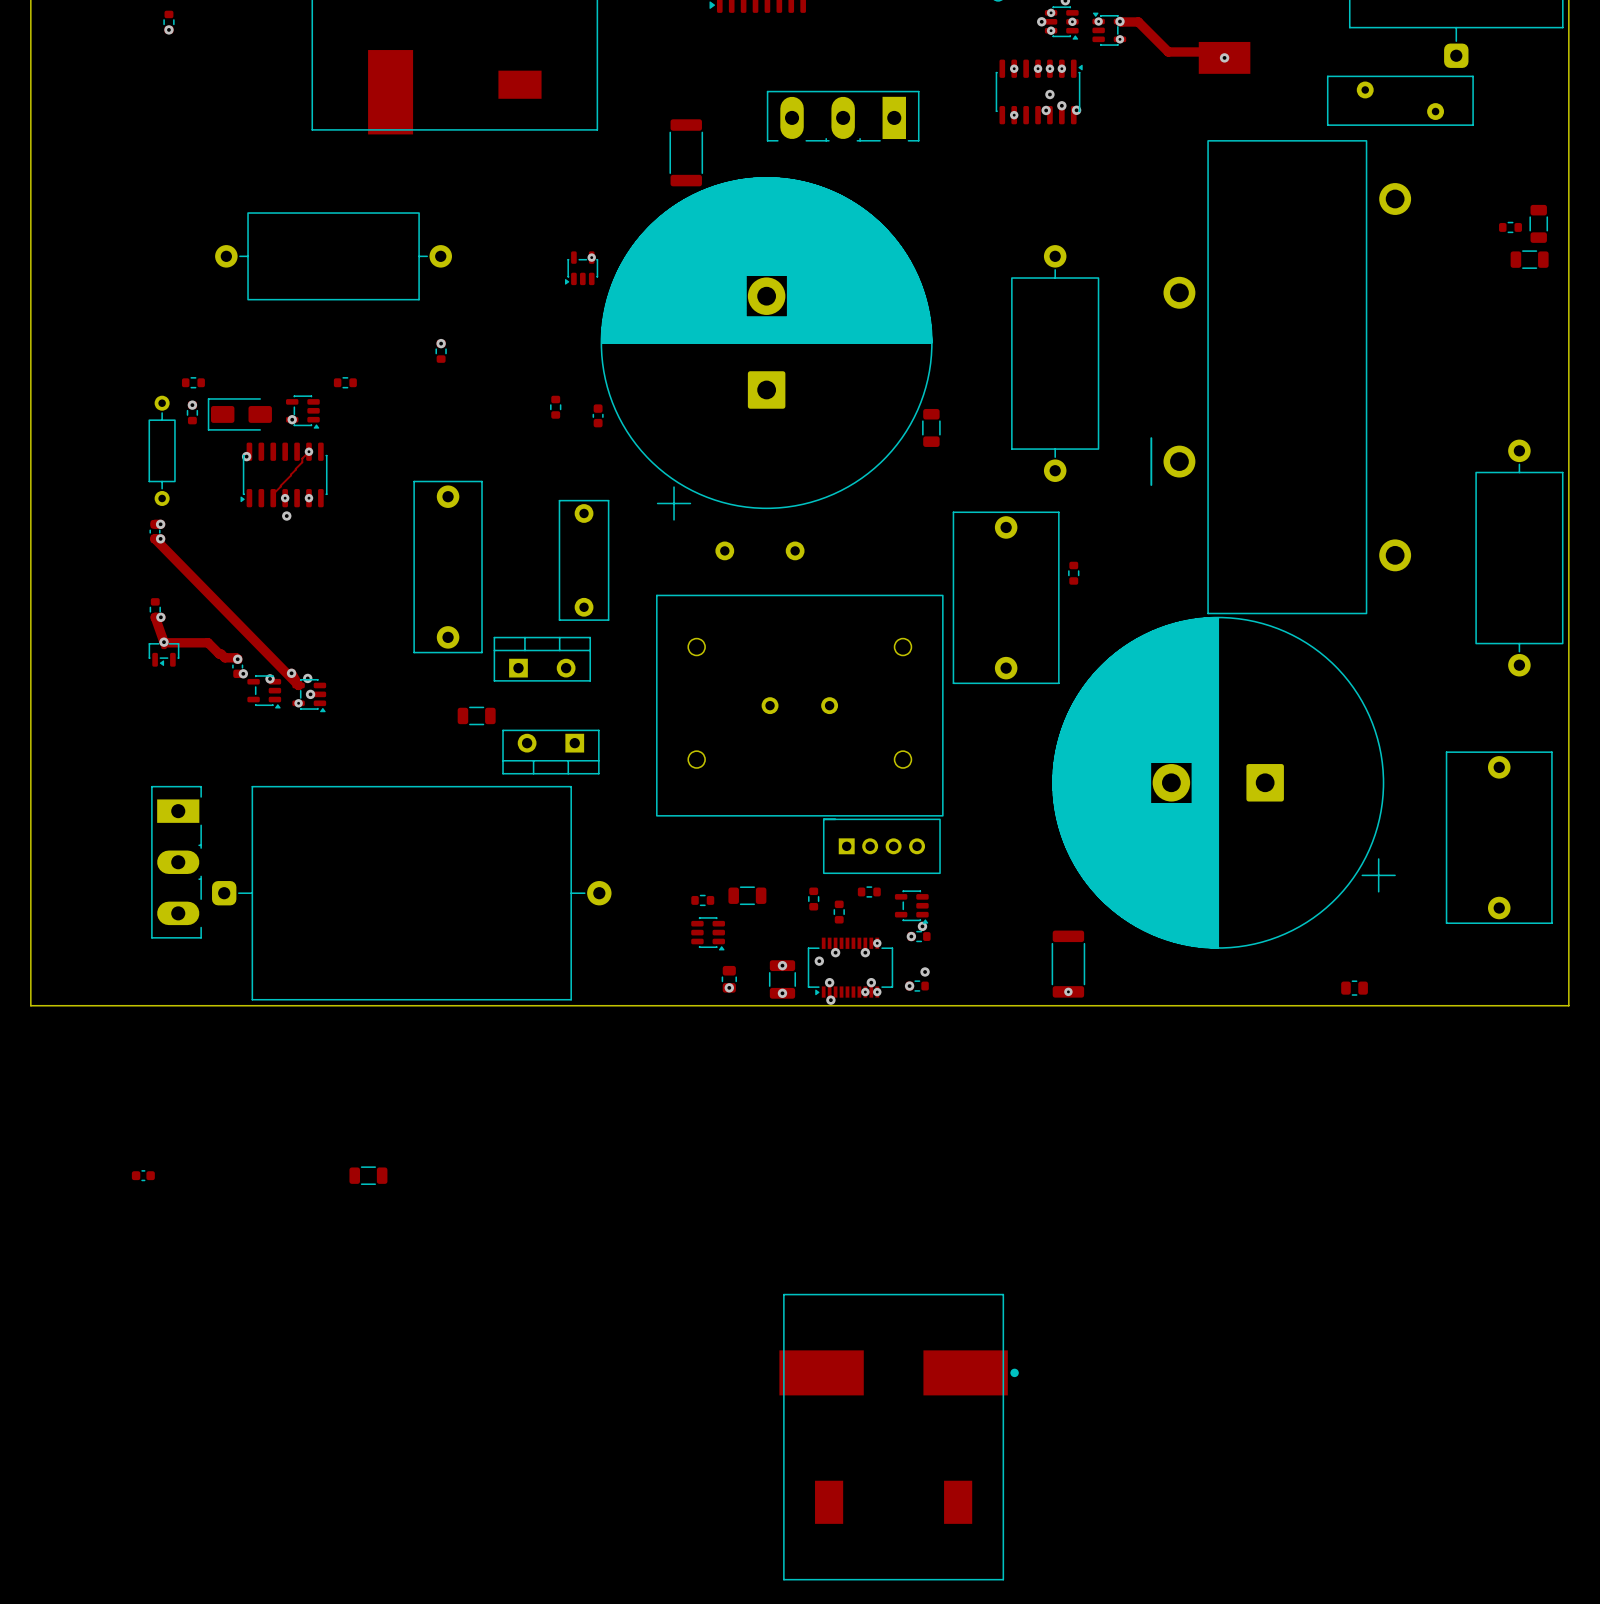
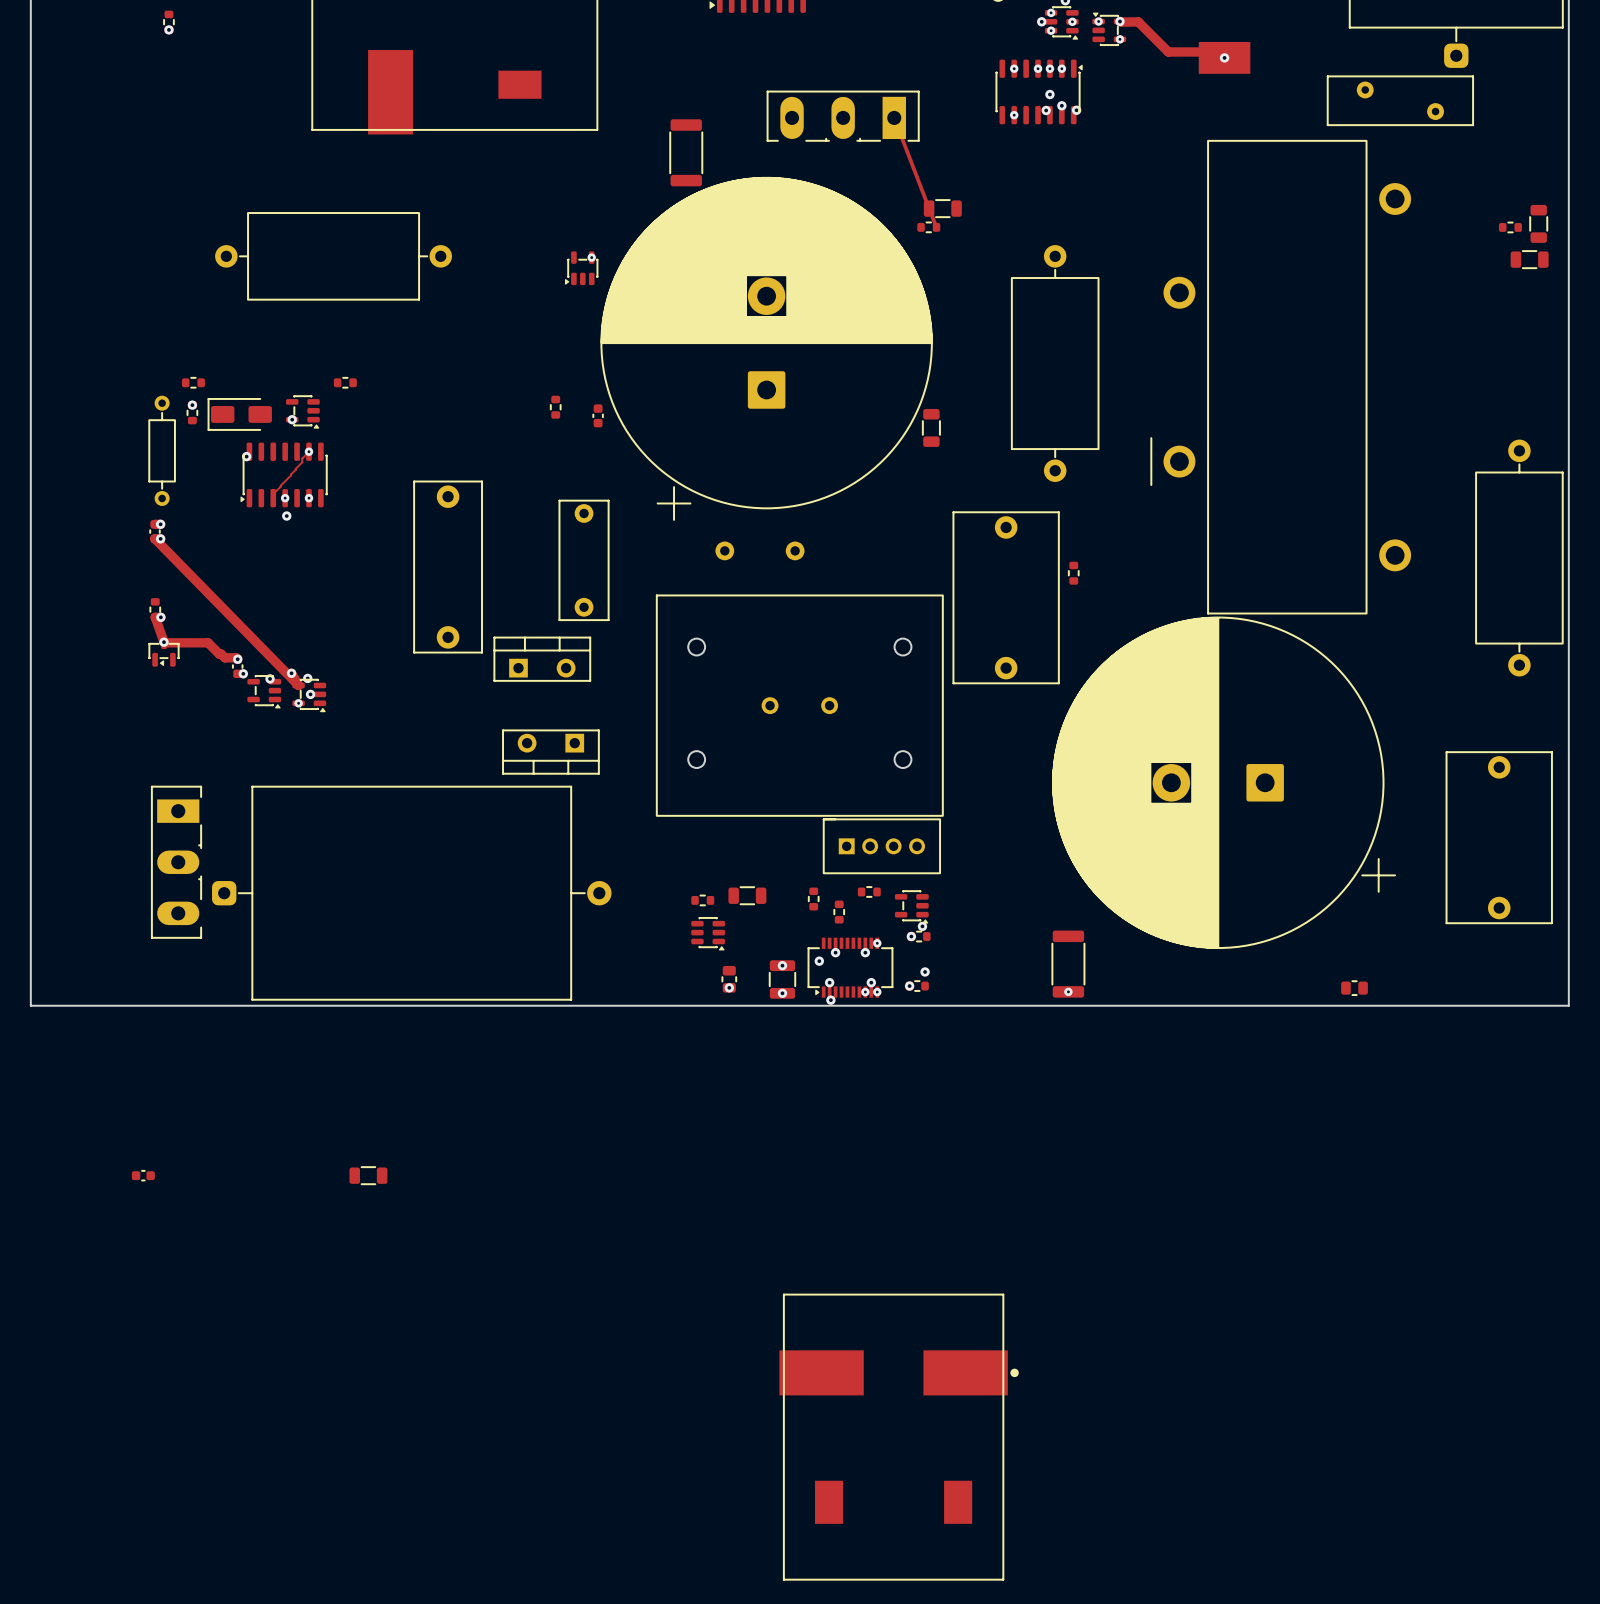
track: none -> (894, 117) (936, 227)
part: none -> (942, 208)
part: none -> (928, 227)
via: (441, 343) -> none
part: (441, 351) -> none
part: (476, 715) -> none

